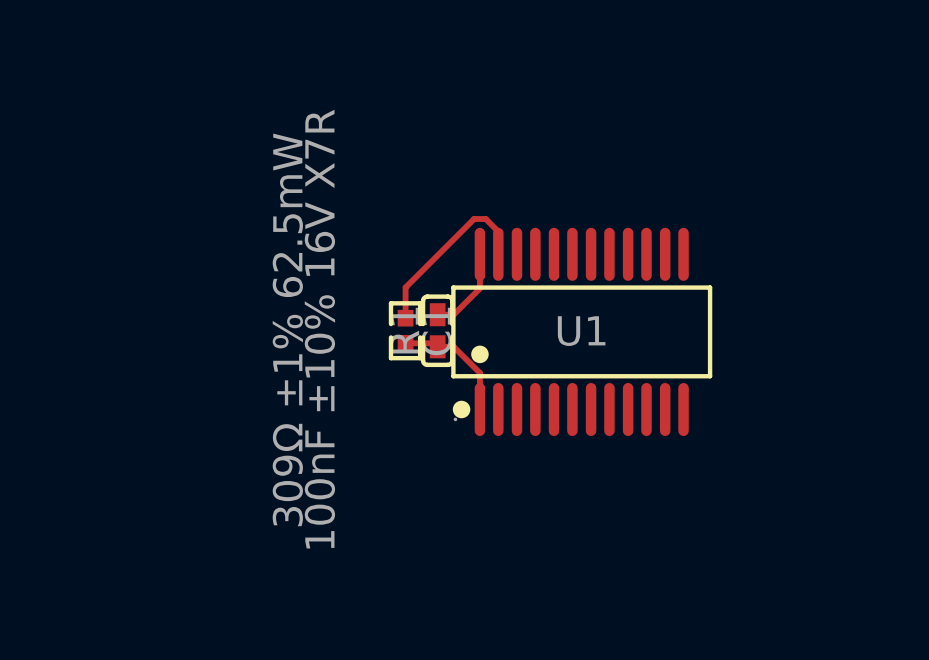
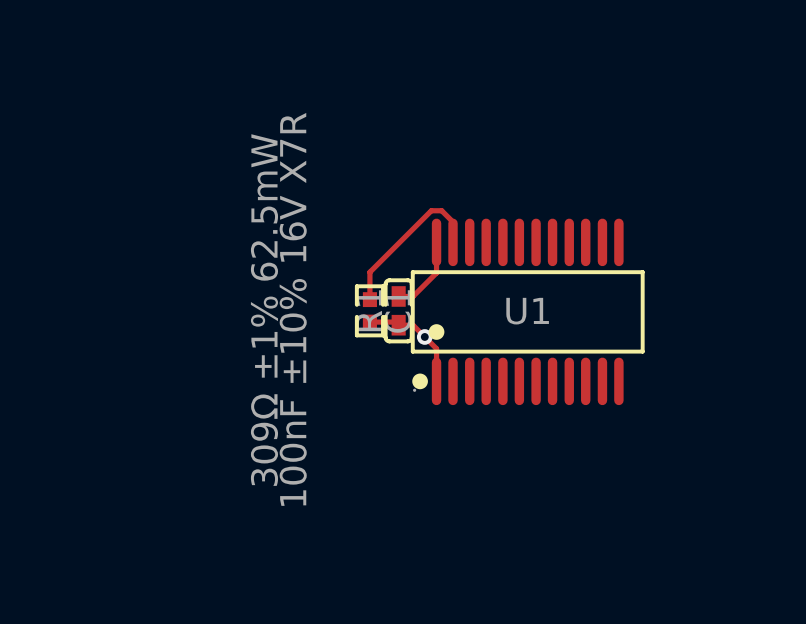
via: none -> (424, 336)

